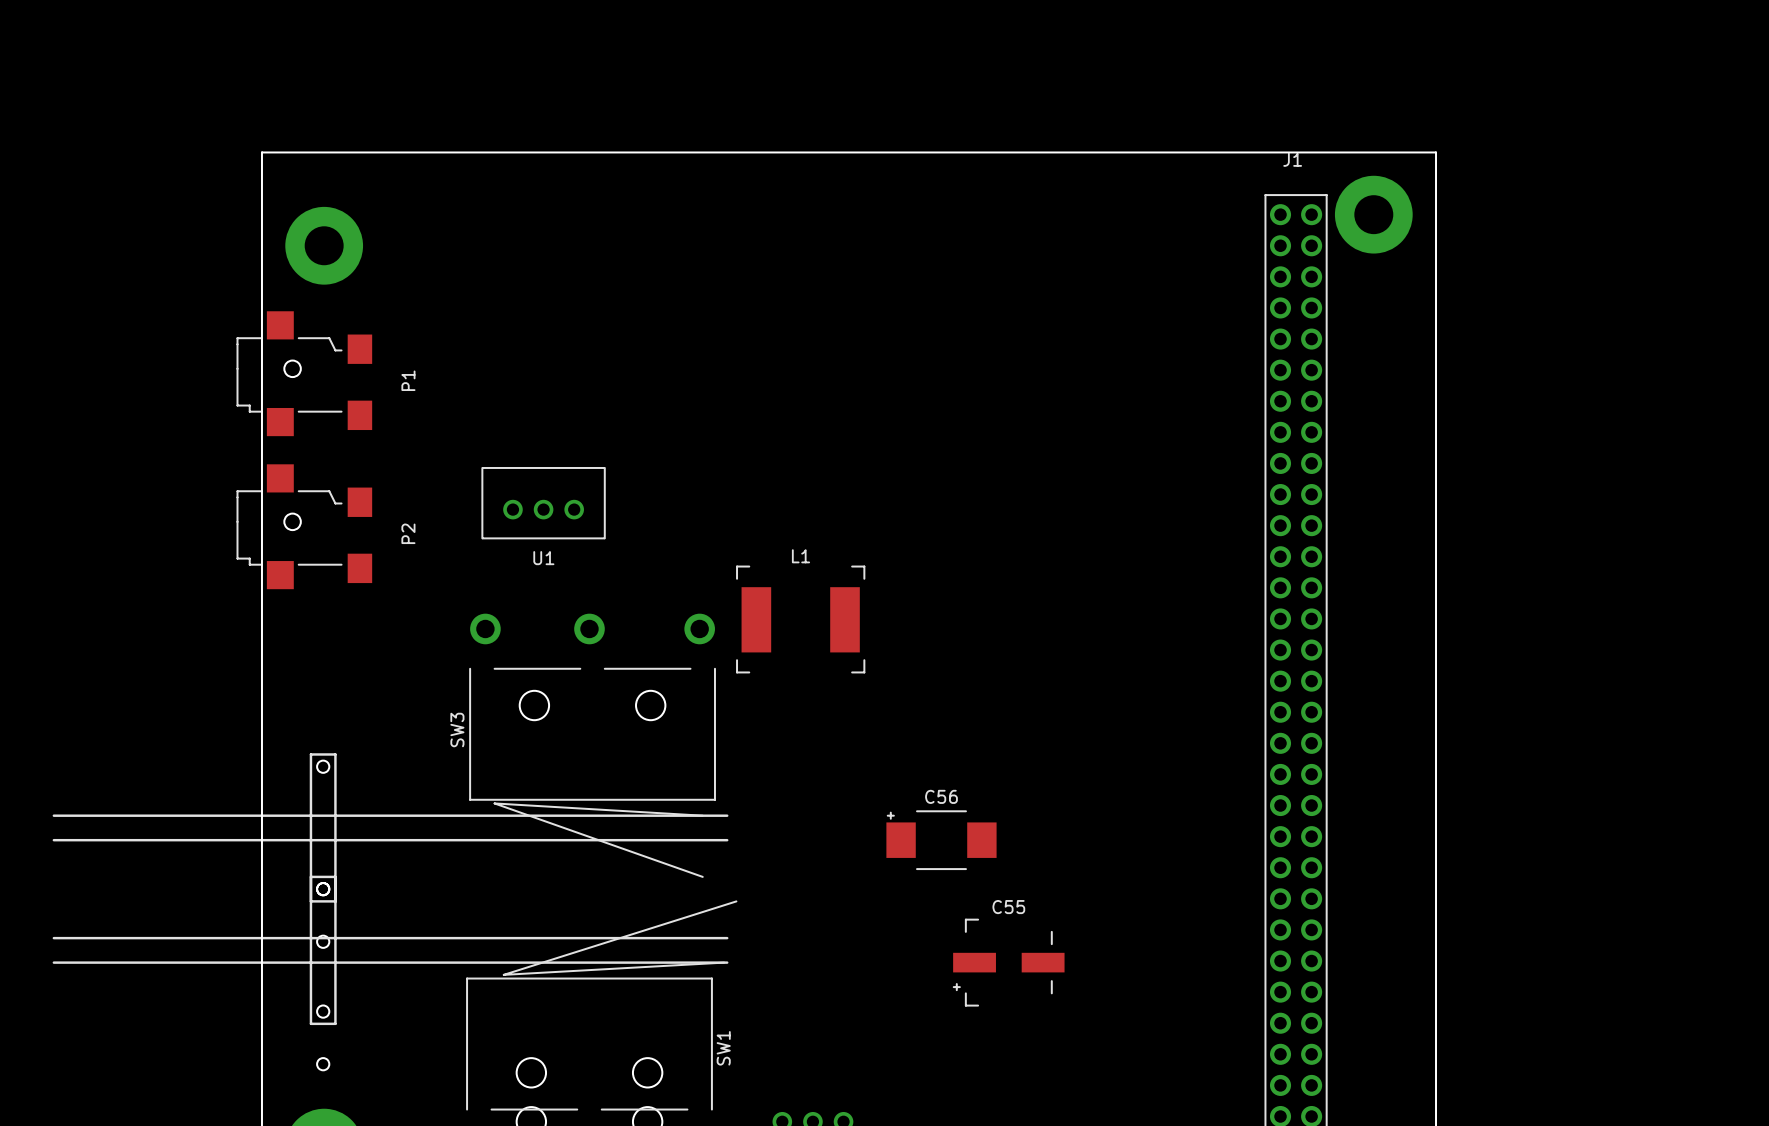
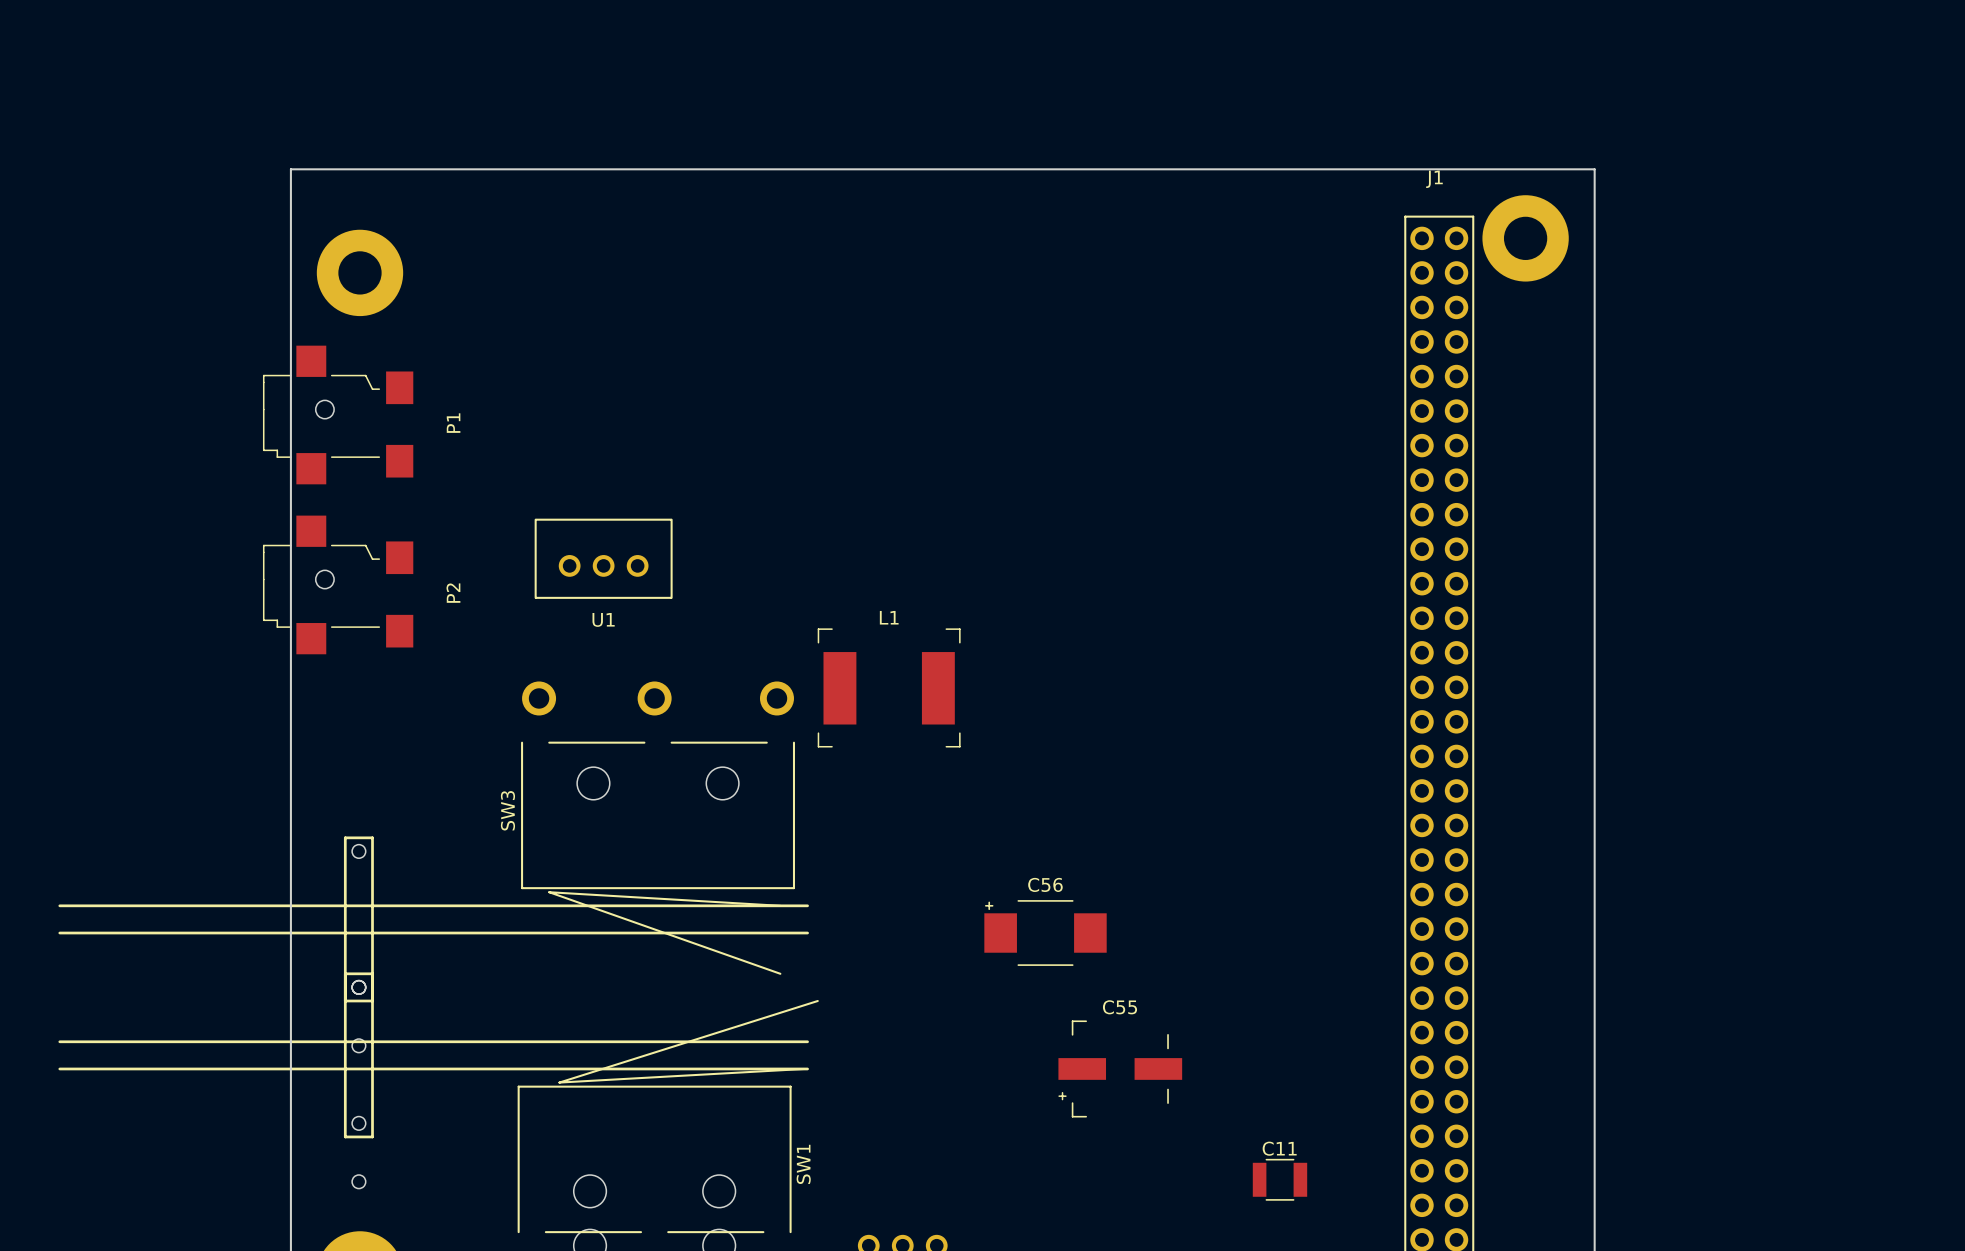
C11: none -> (1279, 1179)

